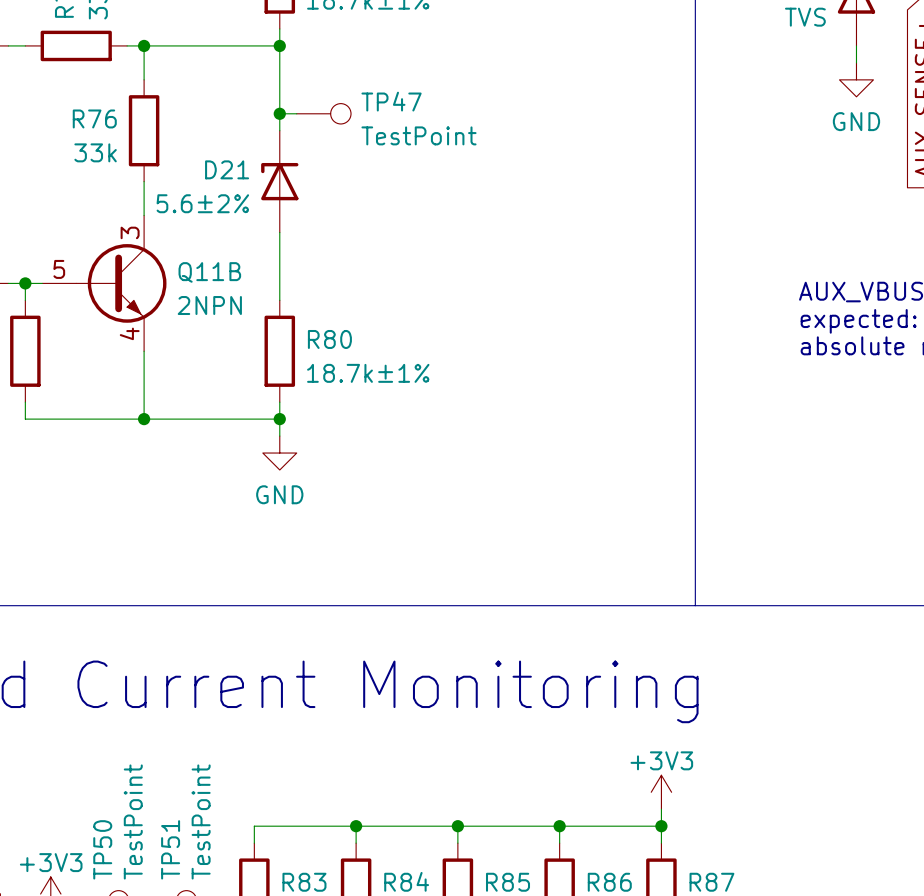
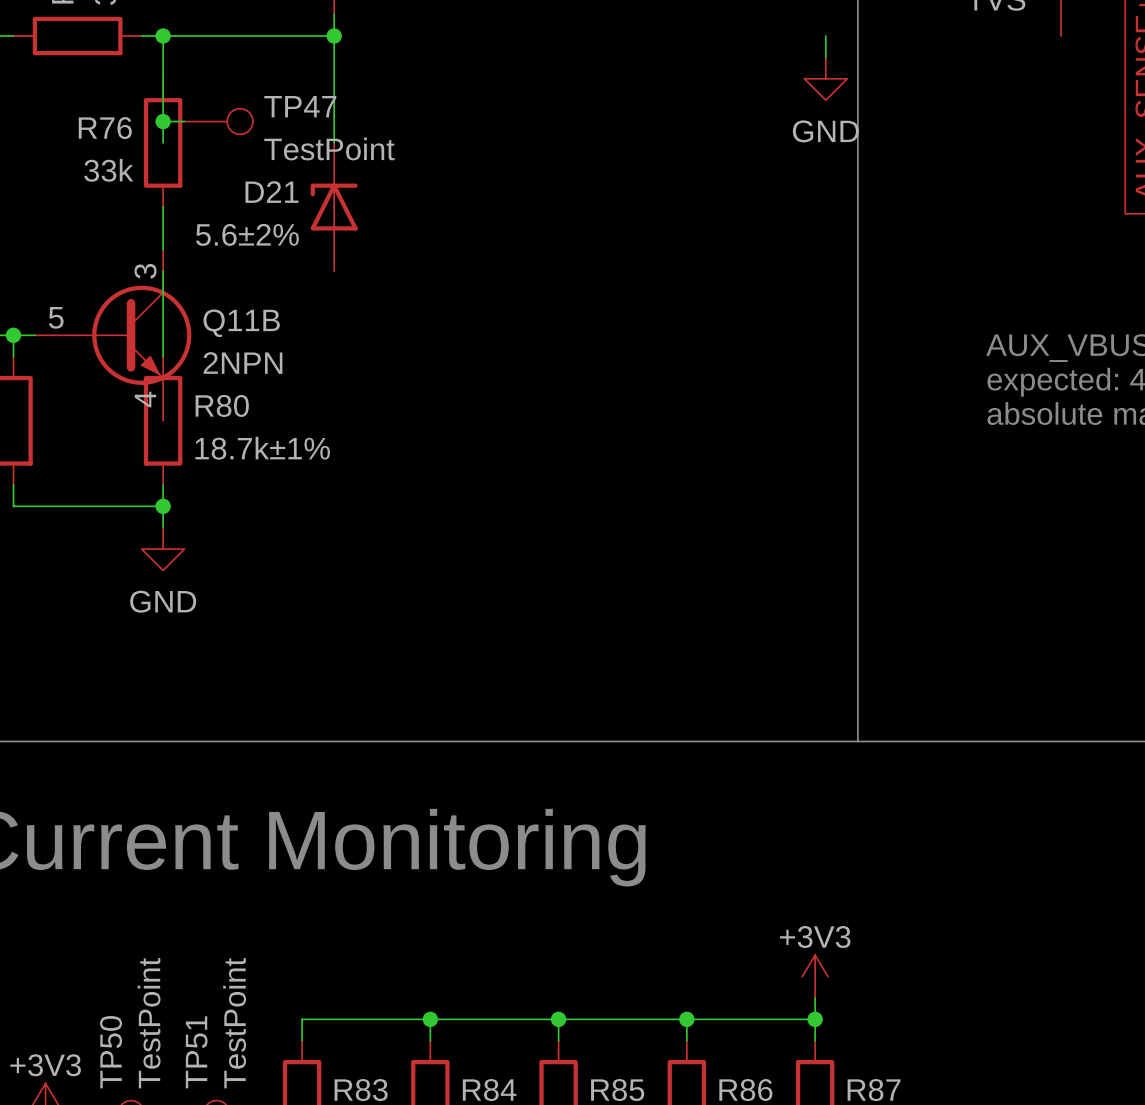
wire: (856, 45) (856, 62) -> (825, 36) (825, 57)
power symbol position: GND (856, 79) -> GND (825, 78)
junction: none -> (163, 121)
wire: (279, 113) (296, 113) -> (163, 121) (184, 121)
junction: (279, 113) -> none
TP47 position: (323, 113) -> (218, 121)
wire: (279, 232) (279, 300) -> (163, 271) (163, 356)
wire: (144, 351) (144, 402) -> (163, 78) (163, 142)
R80 position: (279, 351) -> (163, 420)
wire: (279, 402) (279, 436) -> none
wire: (144, 419) (279, 419) -> (163, 506) (163, 527)
junction: (279, 419) -> none
power symbol position: GND (279, 453) -> GND (163, 549)

